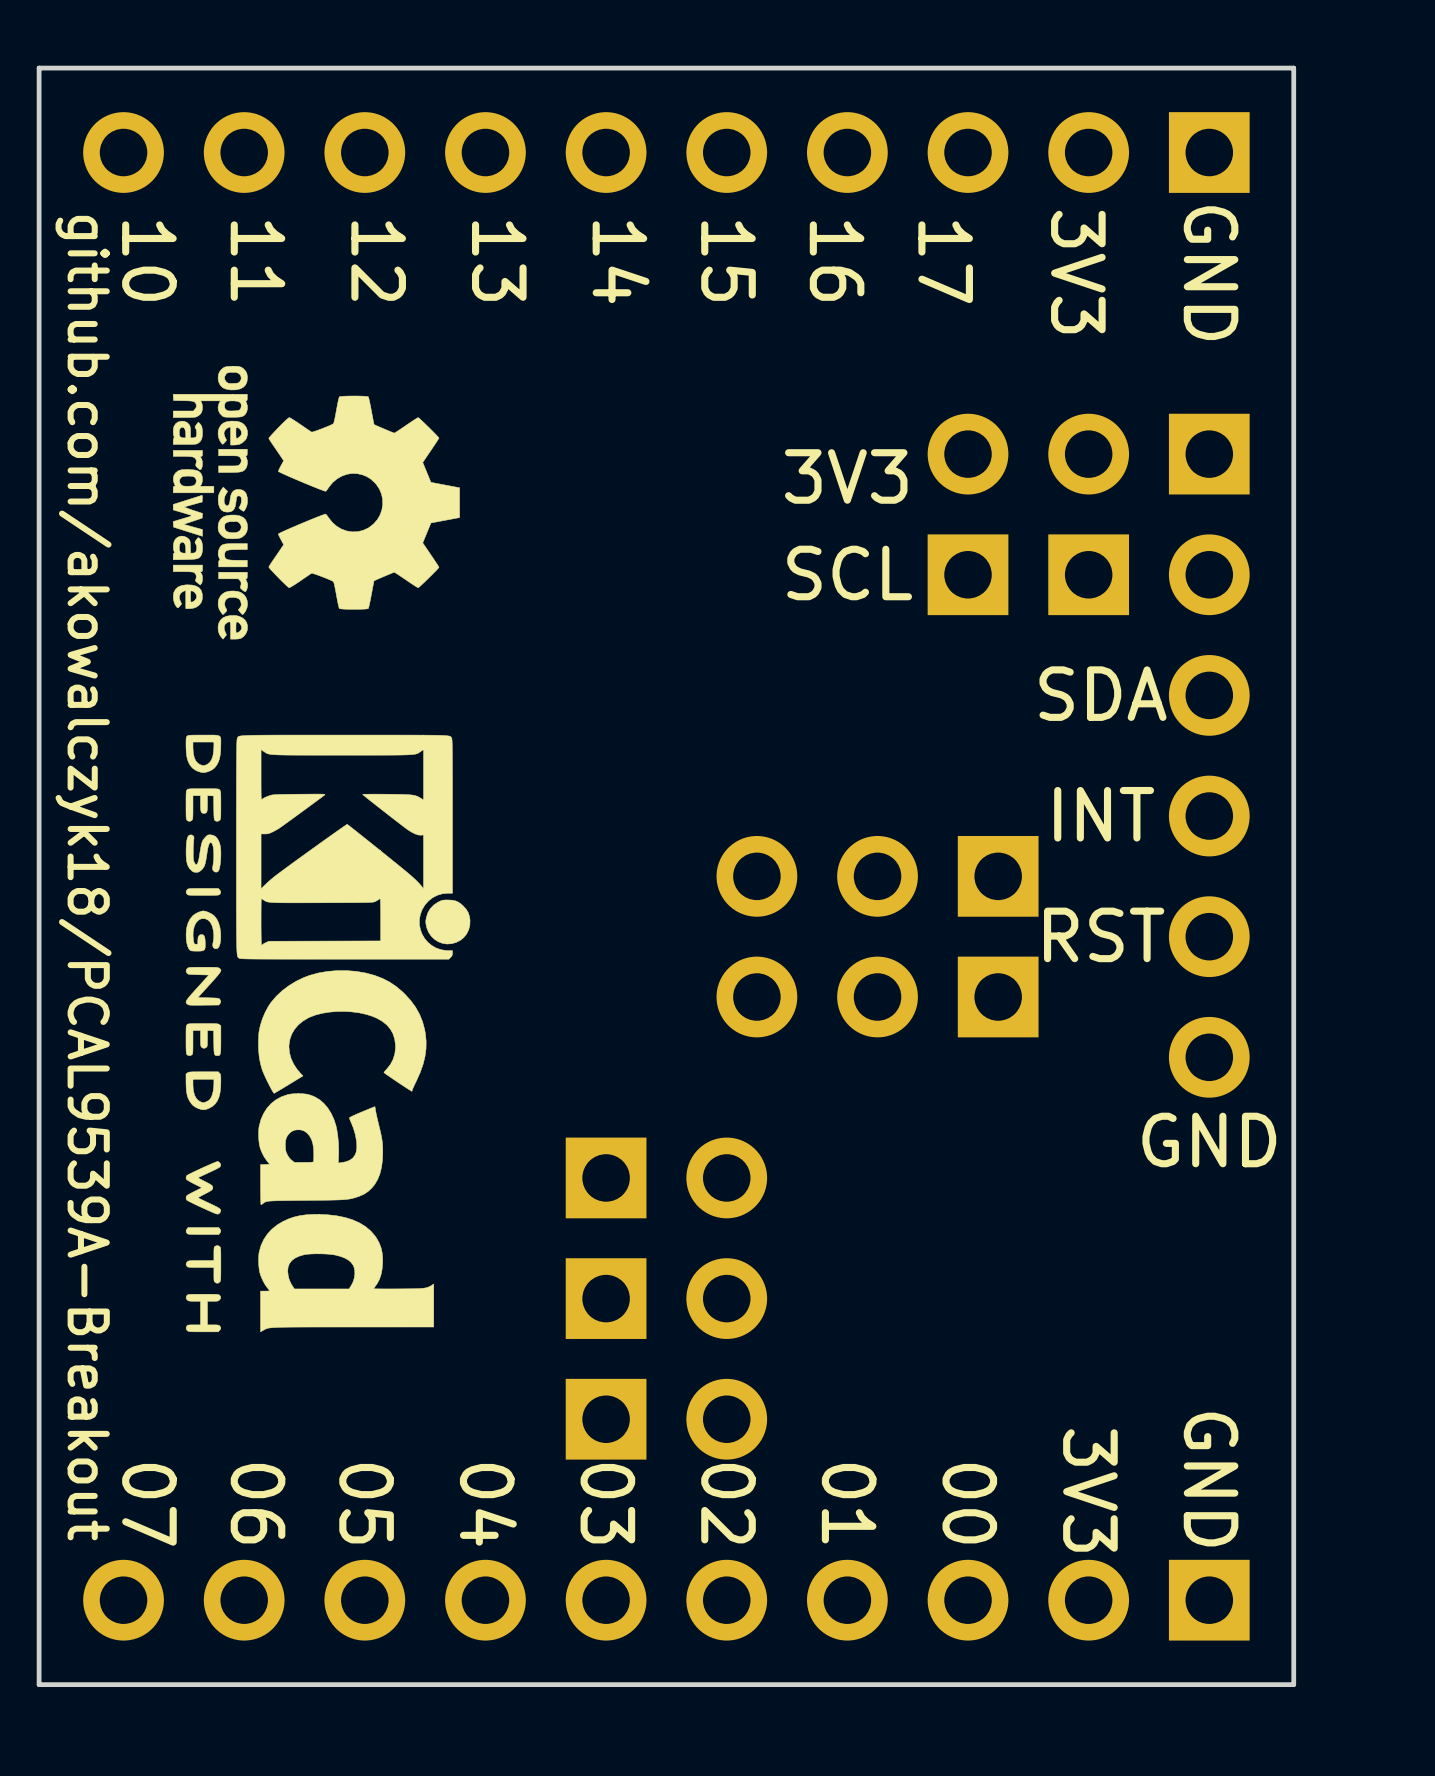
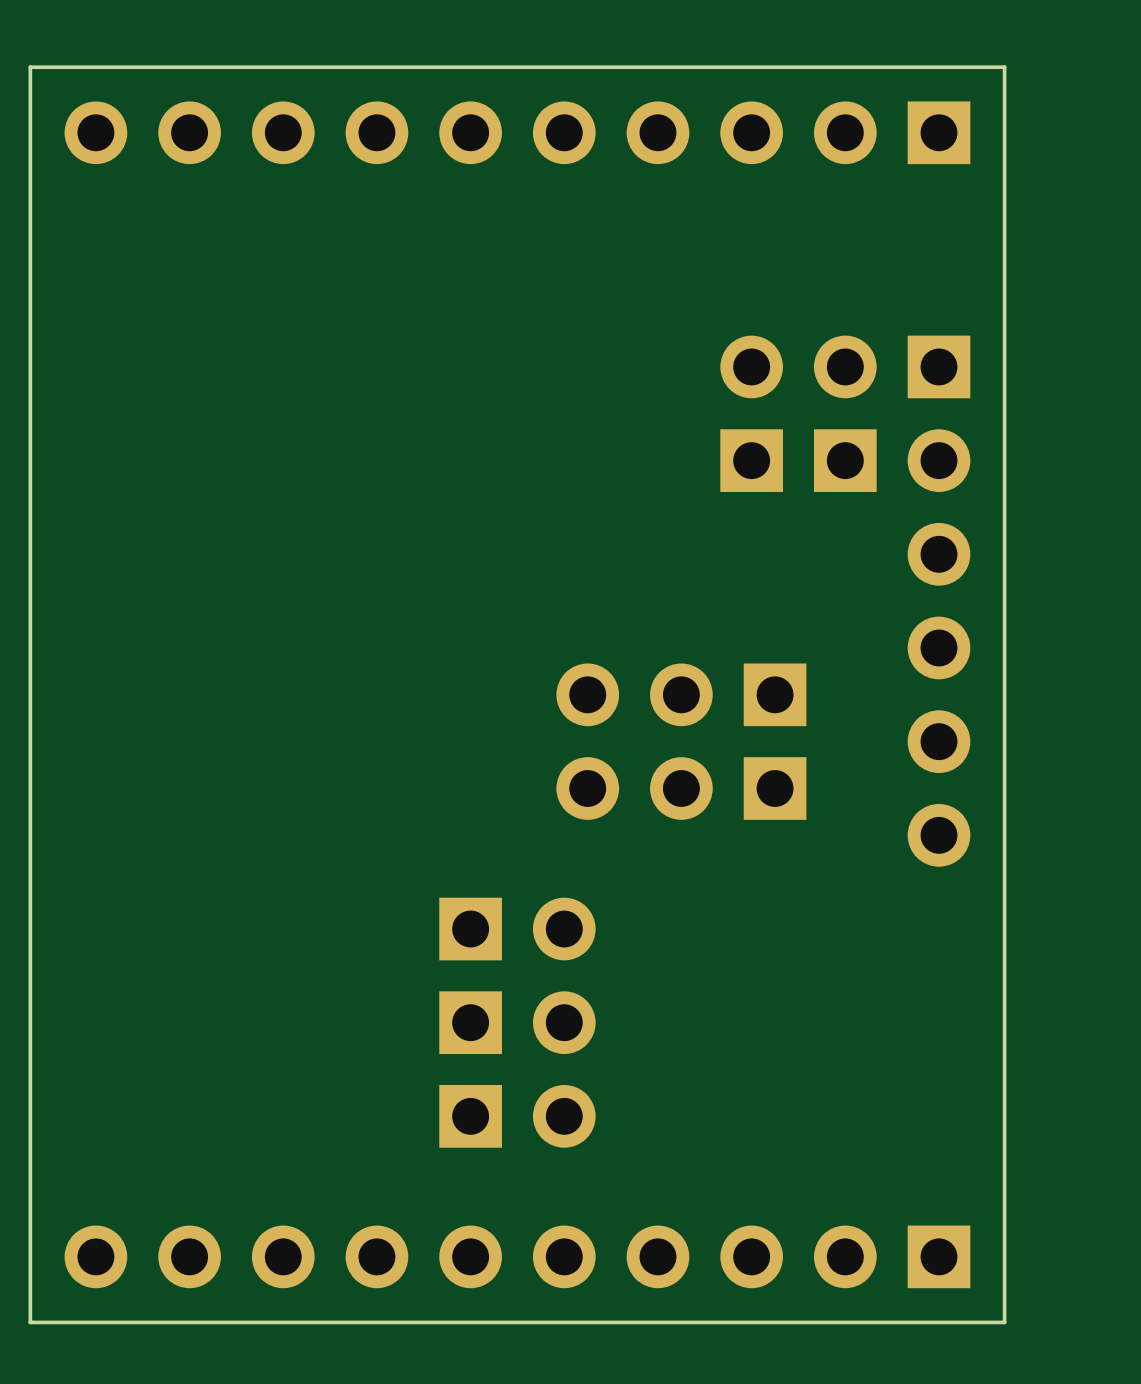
text: 10 (149, 261) -> none
text: 11 (258, 261) -> none
text: 12 (378, 261) -> none
text: 13 (499, 261) -> none
text: 15 (728, 261) -> none
text: 16 (837, 261) -> none
text: 14 (621, 262) -> none
text: 17 (945, 262) -> none
text: 3V3 (1078, 272) -> none
text: GND (1211, 273) -> none
drawing: [172, 365, 460, 640] -> none
text: 3V3 (846, 476) -> none
text: SCL (849, 572) -> none
text: SDA (1102, 693) -> none
drawing: [185, 734, 471, 1333] -> none
text: INT (1104, 814) -> none
text: github.com/akowalczyk18/PCAL9539A-Breakout (83, 878) -> none
text: RST (1104, 934) -> none
text: GND (1209, 1139) -> none
text: GND (1211, 1479) -> none
text: 3V3 (1090, 1490) -> none
text: 06 (258, 1503) -> none
text: 05 (366, 1503) -> none
text: 03 (607, 1503) -> none
text: 02 (728, 1503) -> none
text: 01 (849, 1503) -> none
text: 00 (969, 1503) -> none
text: 07 (149, 1504) -> none
text: 04 (488, 1504) -> none

